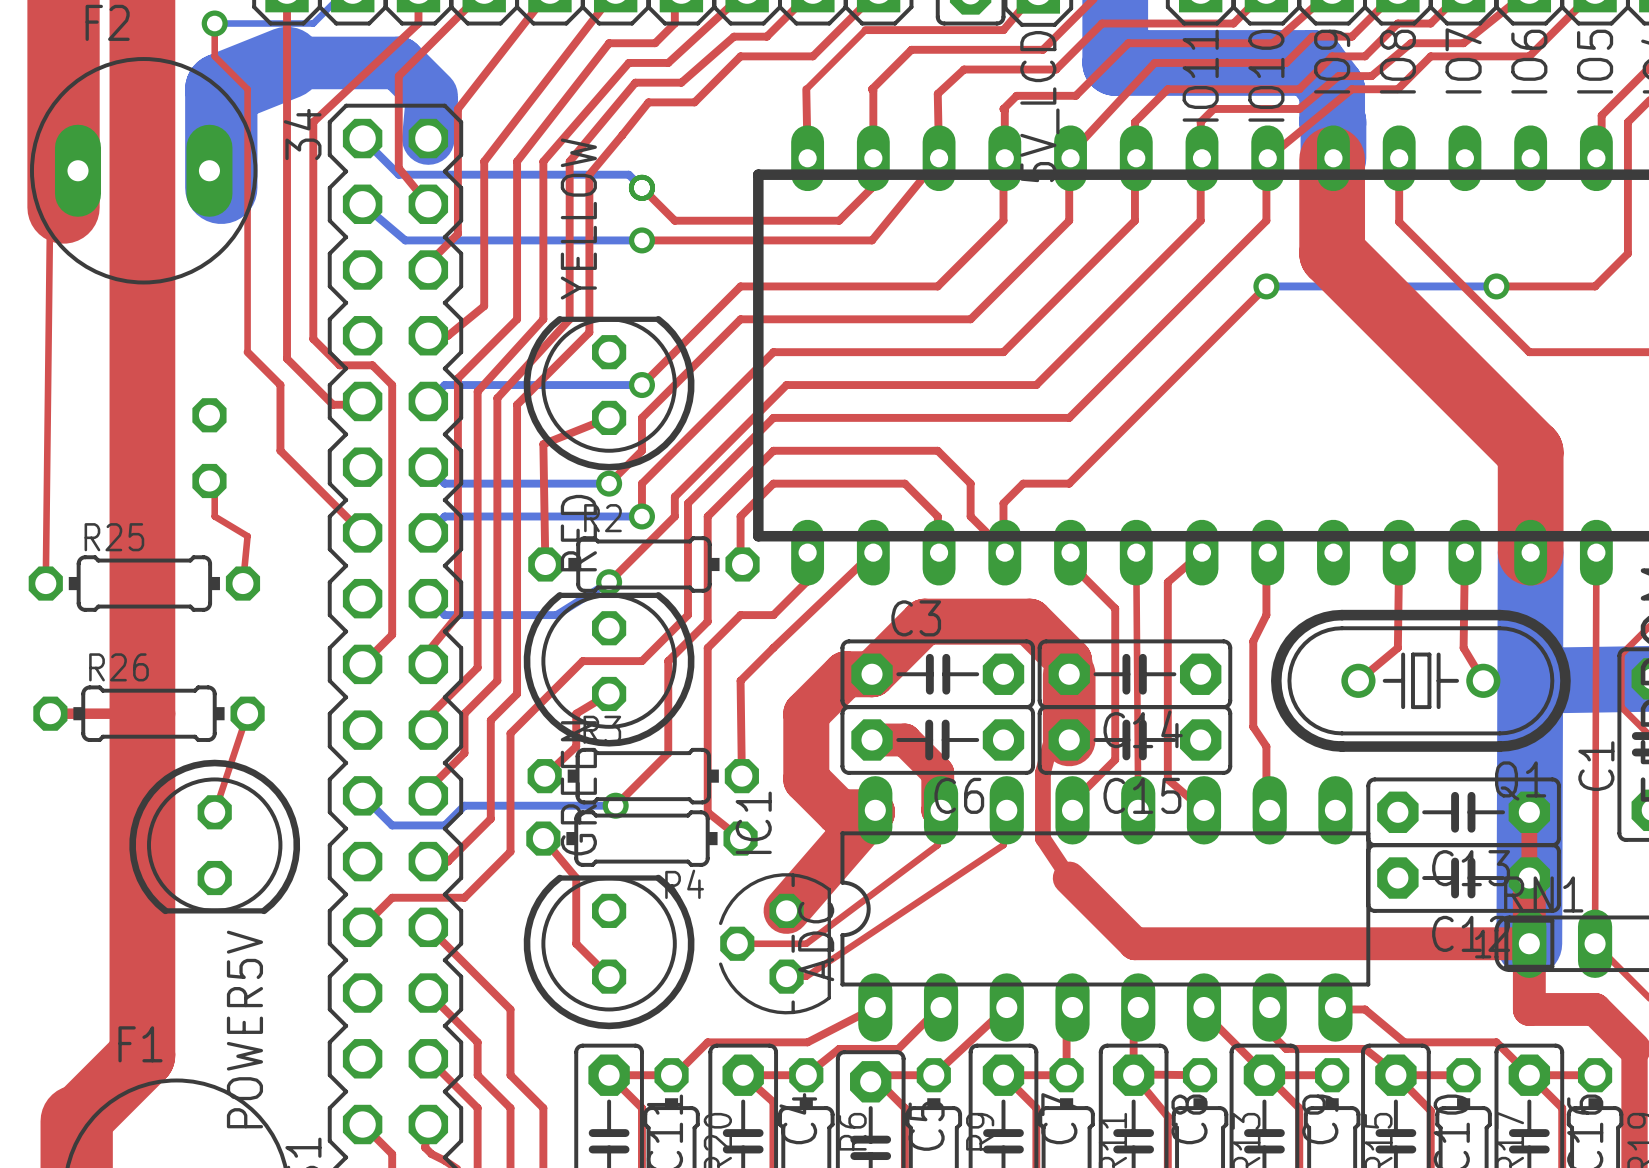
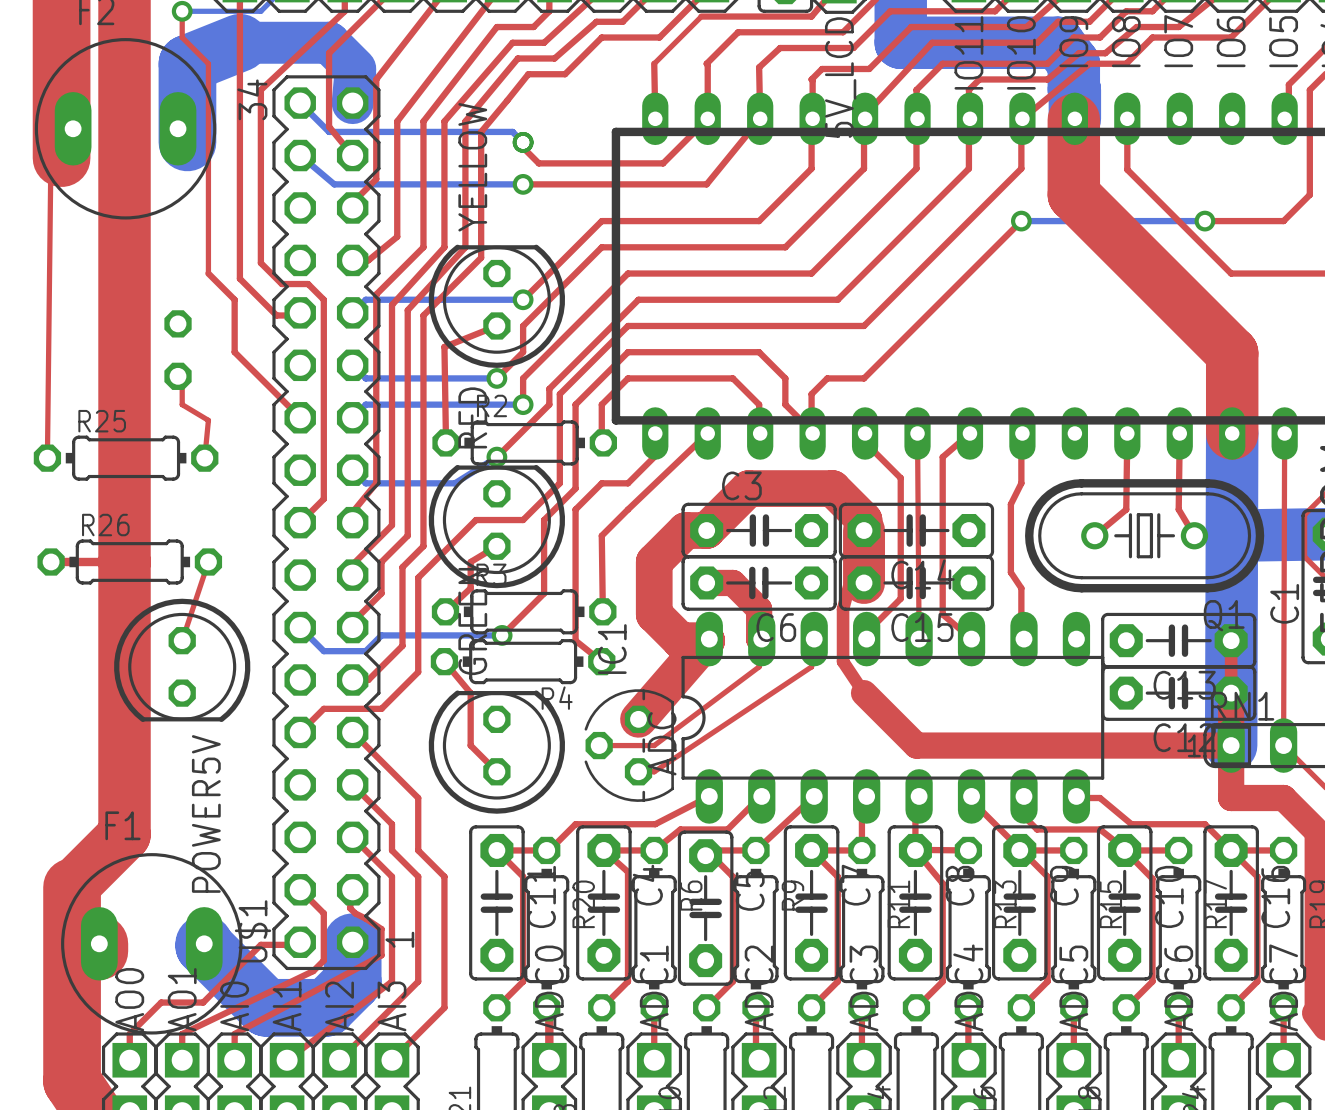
top track: (872, 154) (872, 187) (839, 220) (674, 220) (641, 187) -> (707, 118) (663, 163) (538, 163) (523, 147) (523, 142)

